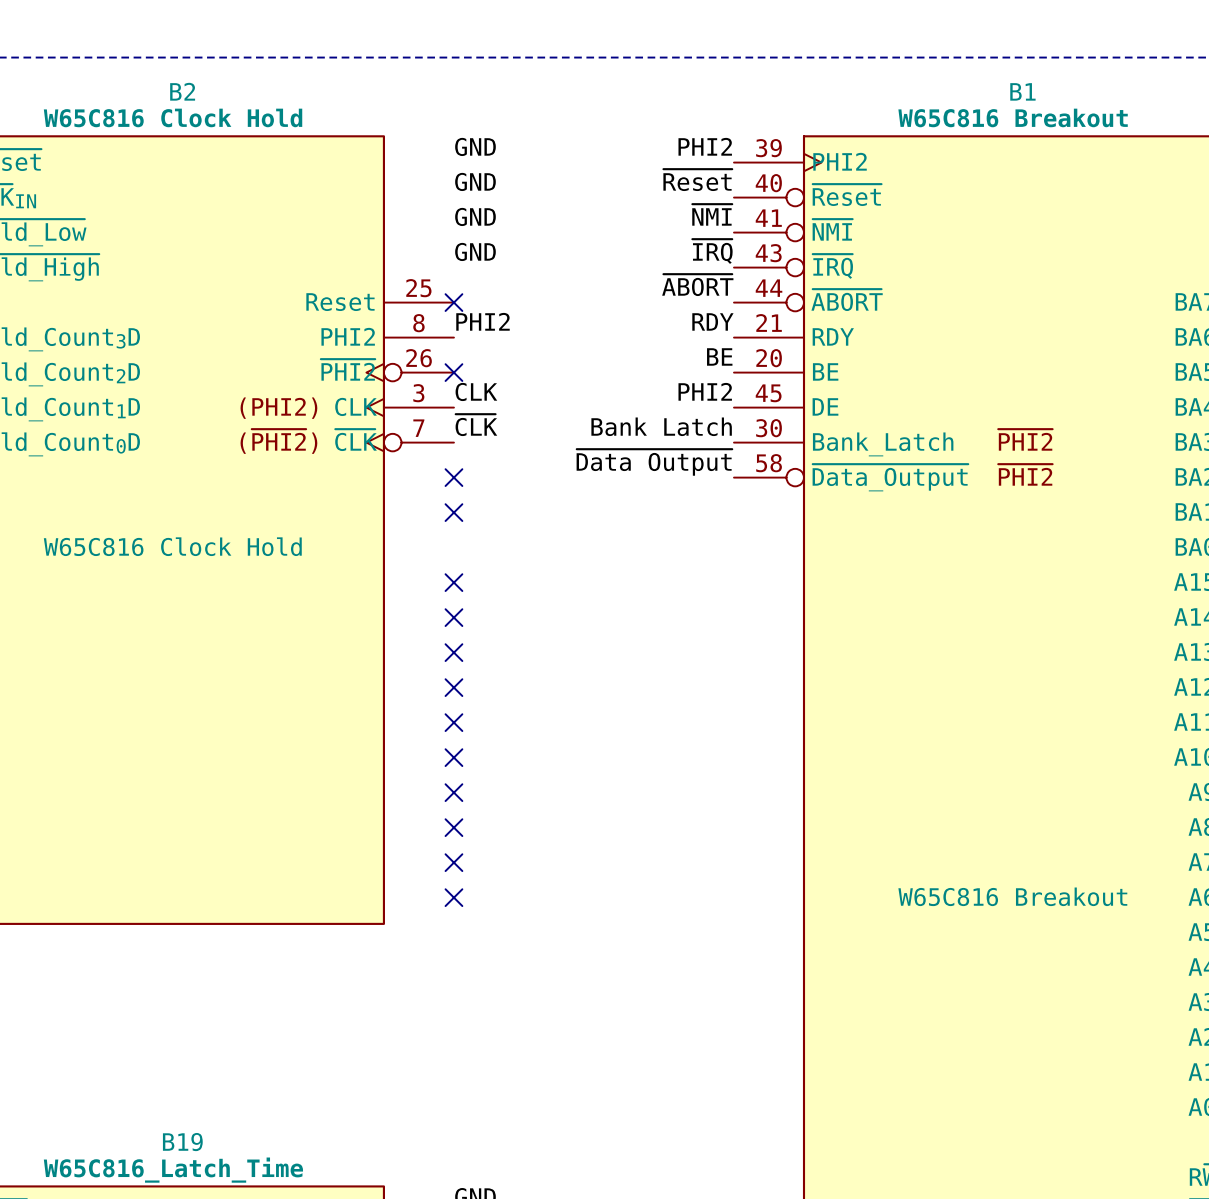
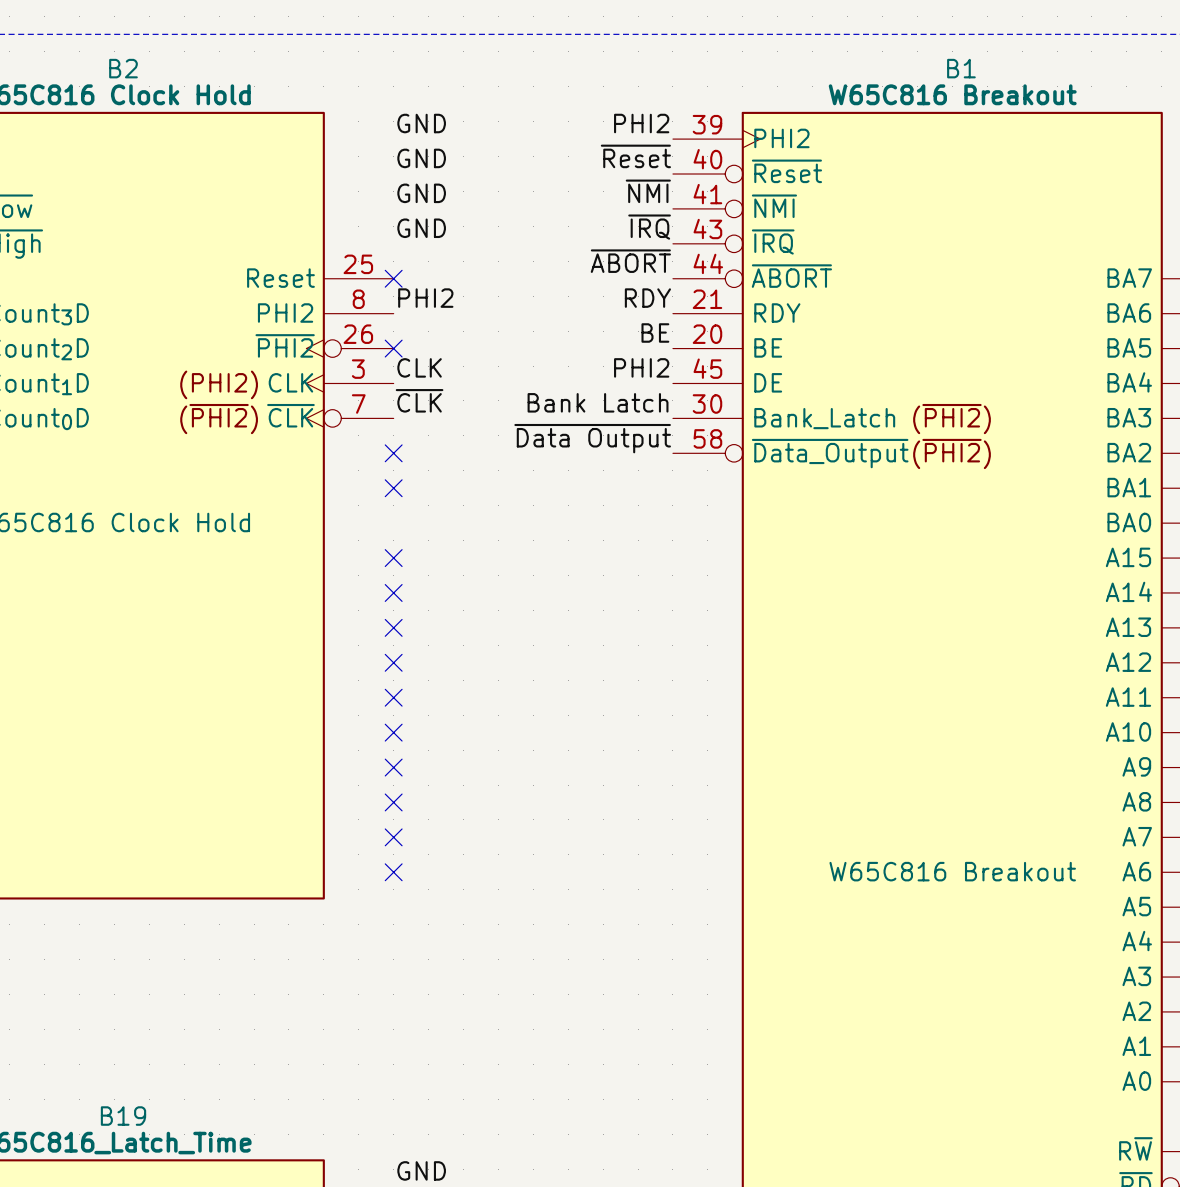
B1 text: ~{PHI2} (1025, 439) -> none
B1 text: none -> (~{PHI2}) (952, 419)
B1 text: ~{PHI2} (1025, 474) -> none
B1 text: none -> (~{PHI2}) (952, 453)

